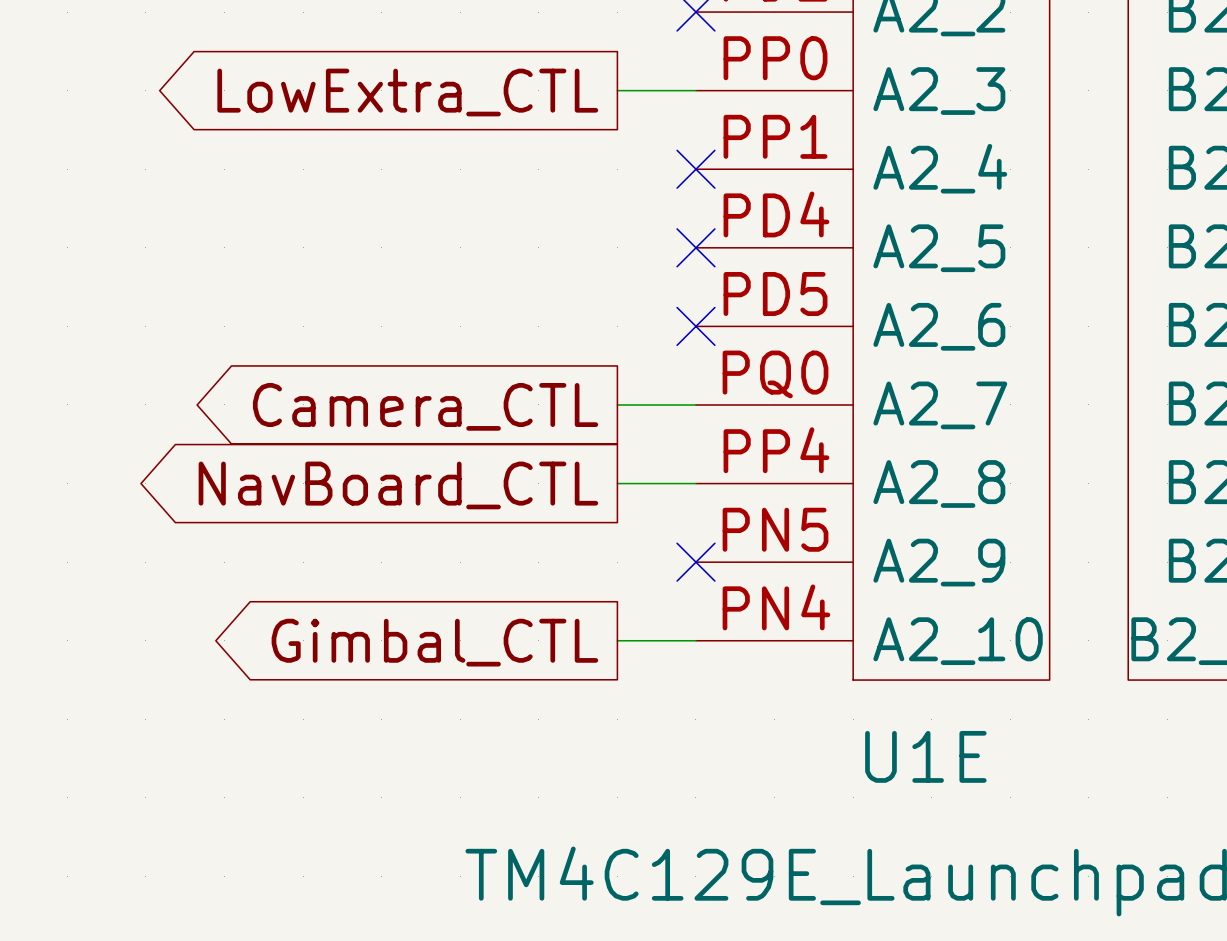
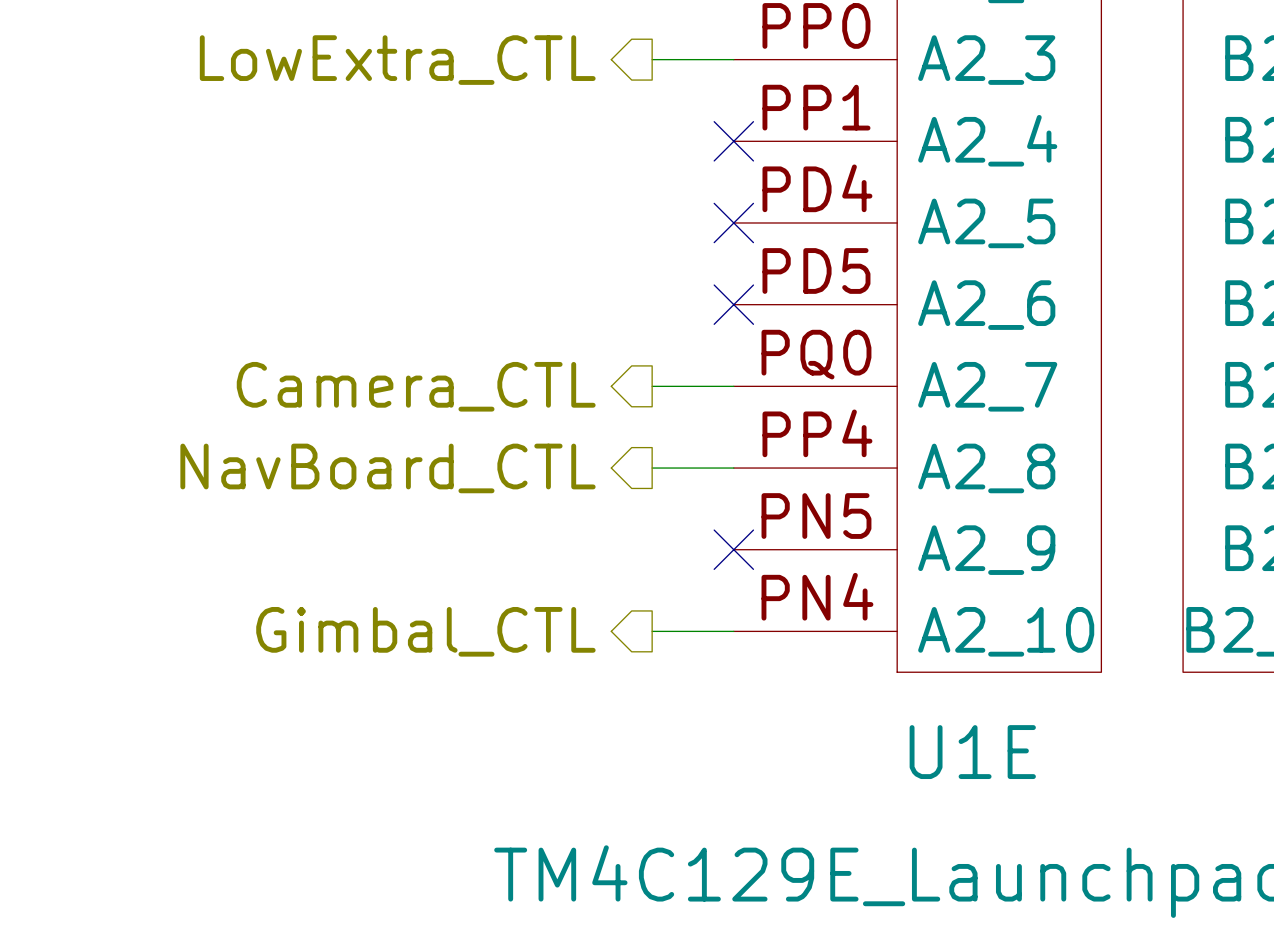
hierarchical label: none -> LowExtra_CTL (397, 60)
global label: LowExtra_CTL (407, 92) -> none
hierarchical label: none -> Camera_CTL (416, 386)
global label: Camera_CTL (425, 406) -> none
hierarchical label: none -> NavBoard_CTL (387, 468)
global label: NavBoard_CTL (398, 485) -> none
hierarchical label: none -> Gimbal_CTL (425, 631)
global label: Gimbal_CTL (434, 642) -> none

